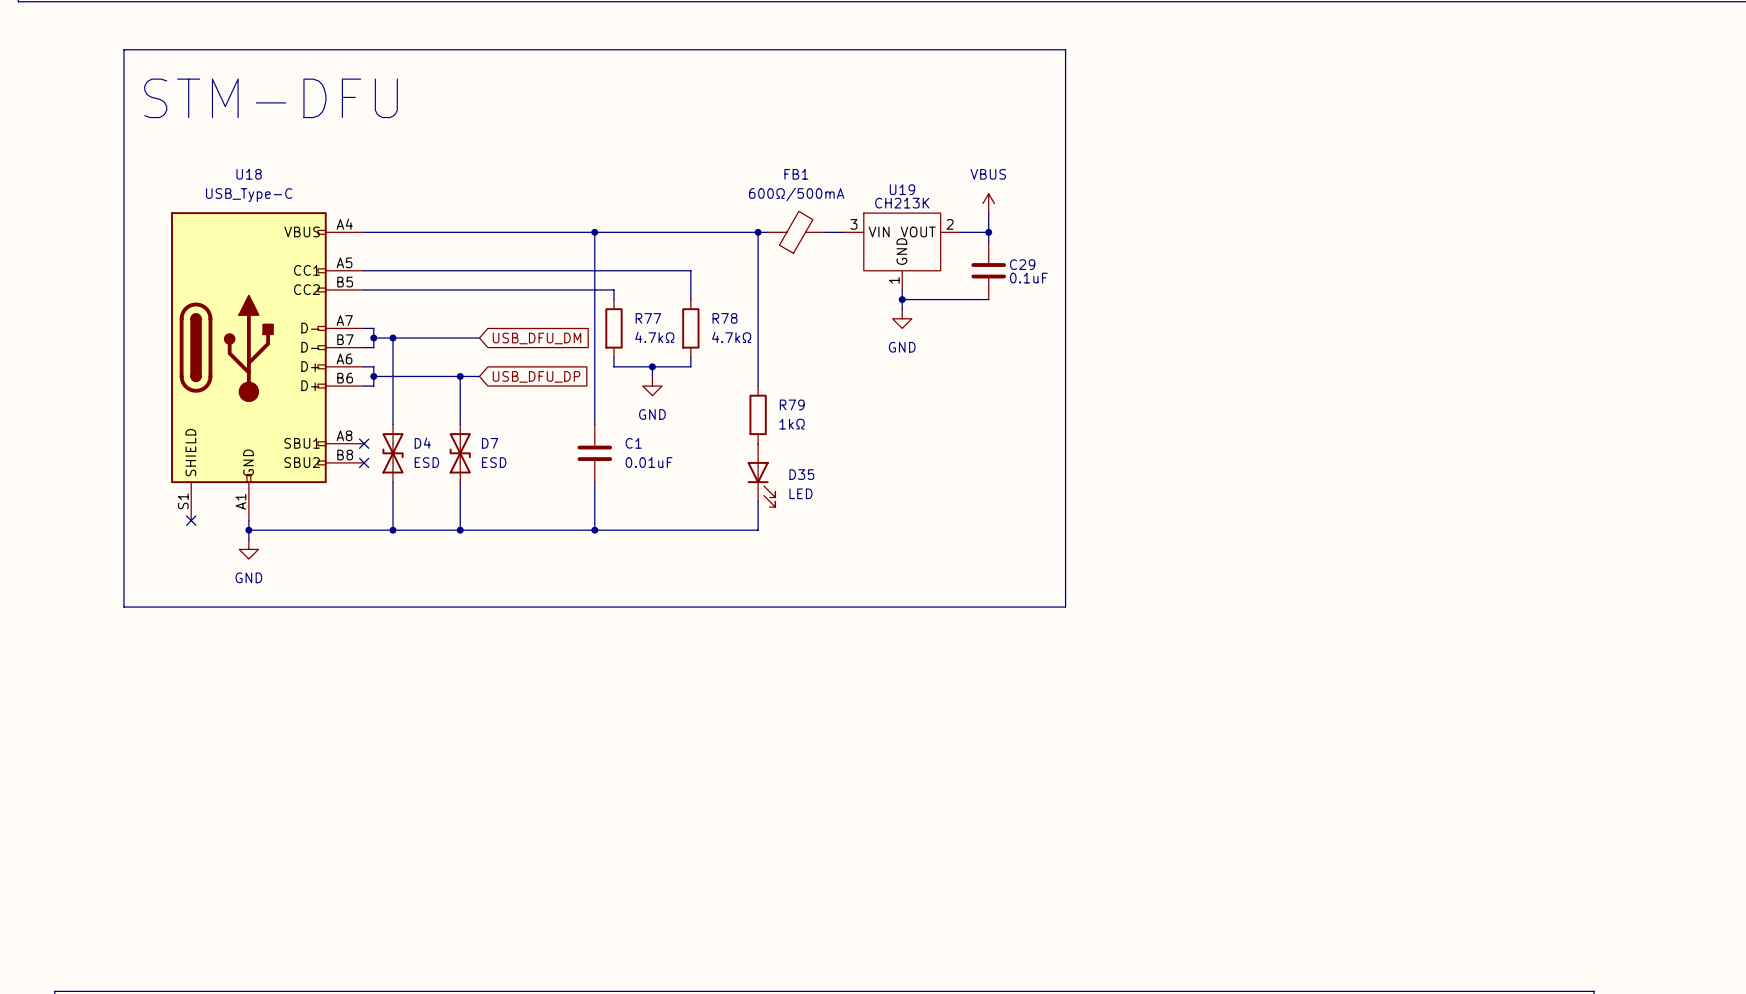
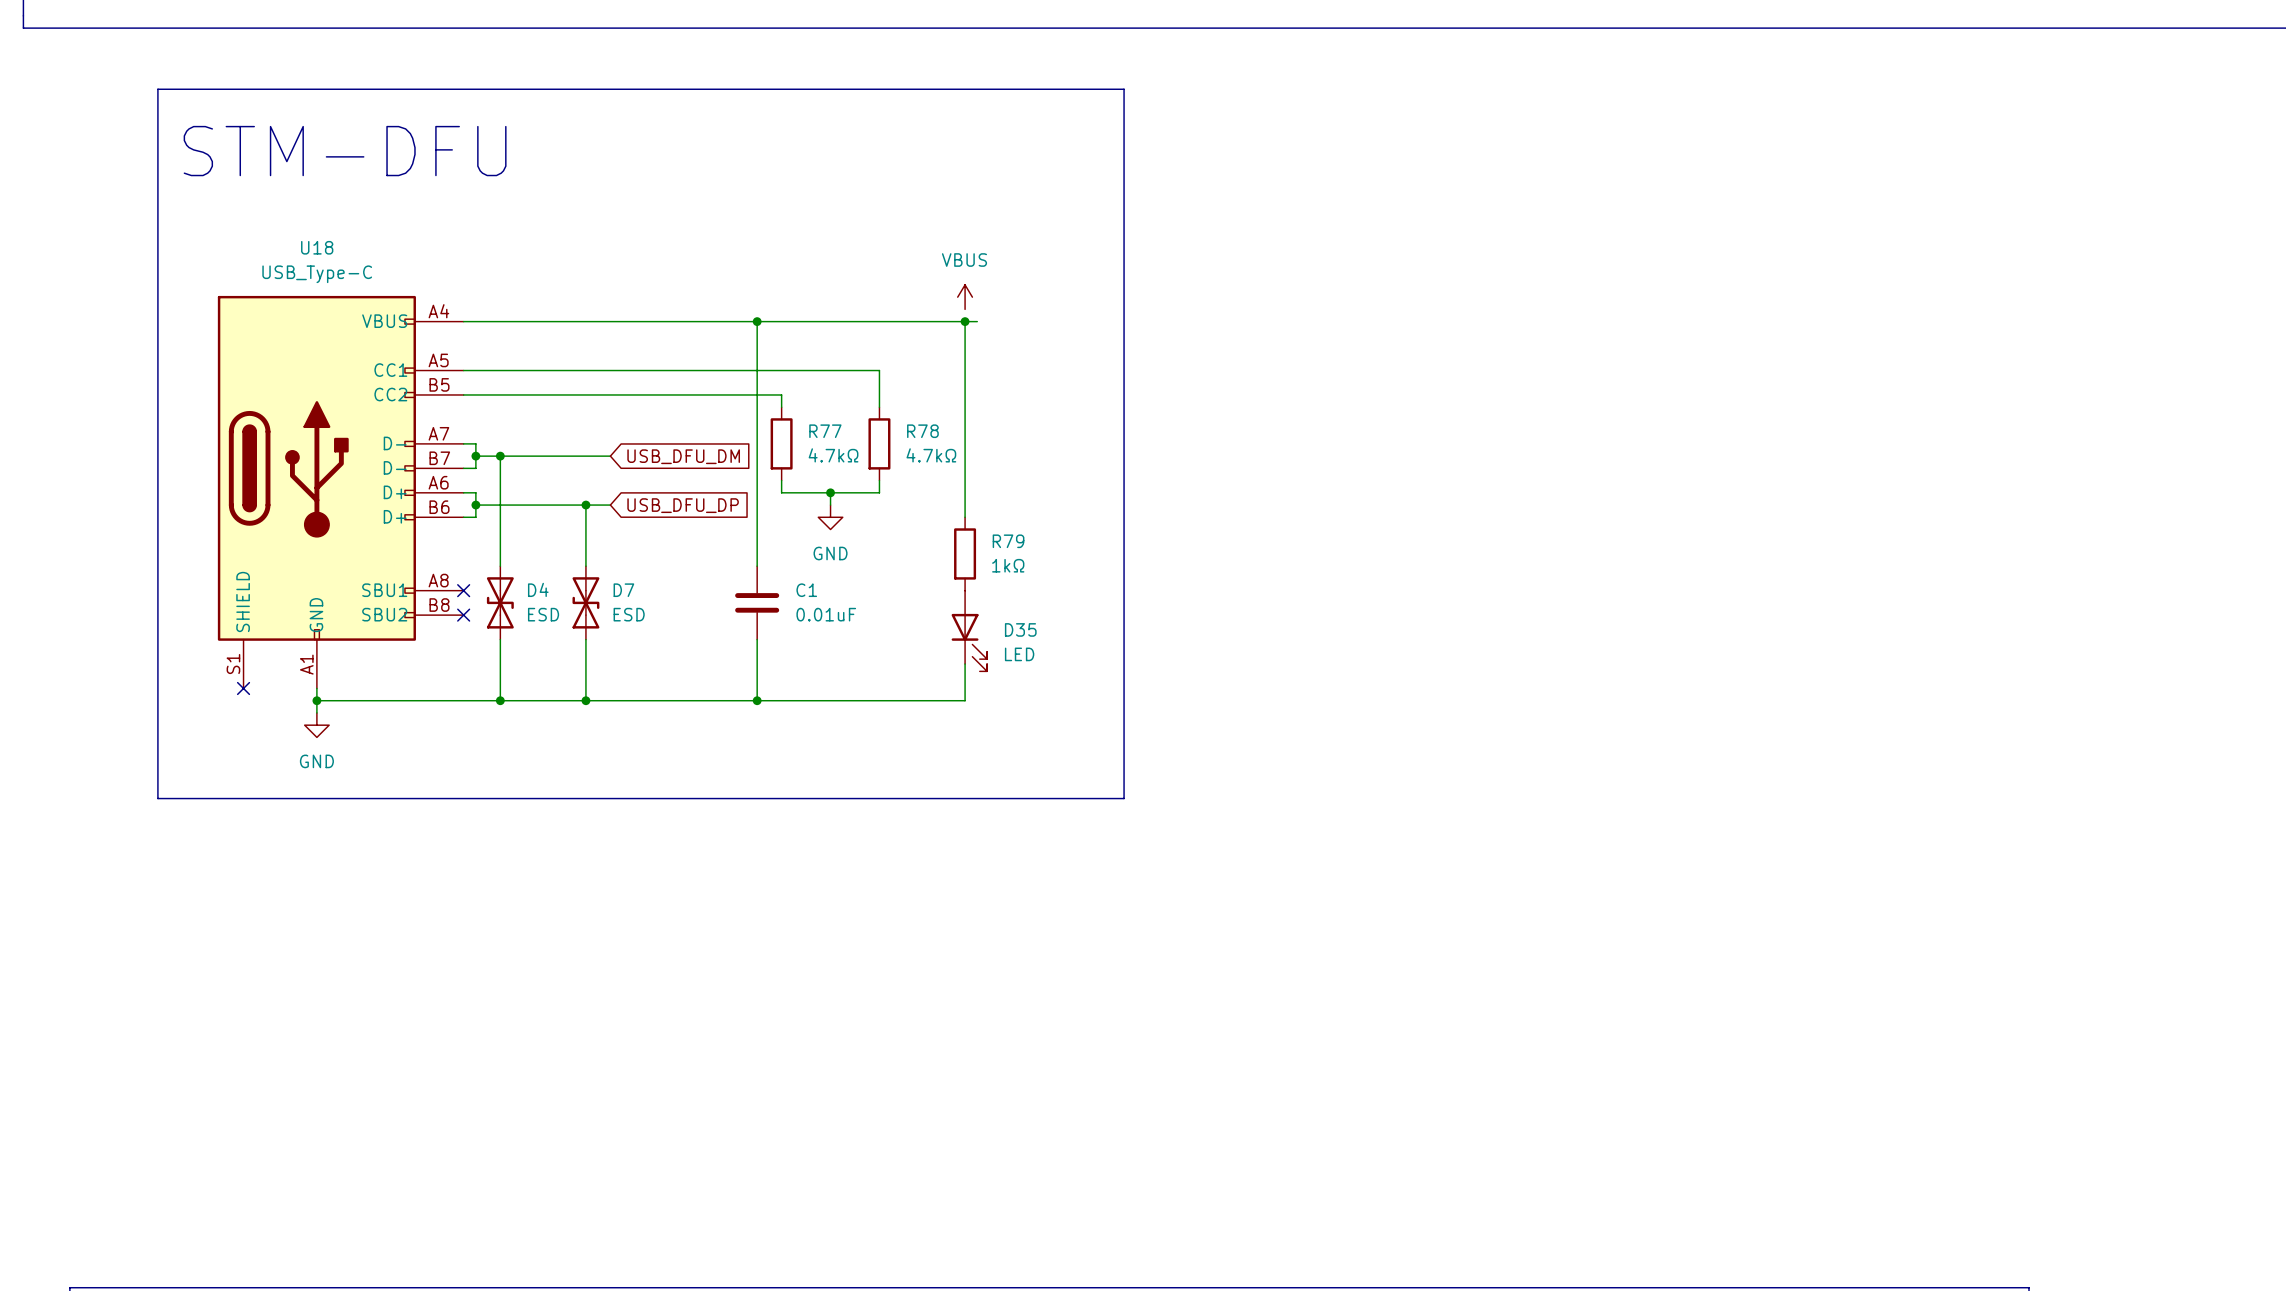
line: (883, 49) (1065, 49) (1065, 607) (883, 607) -> (1124, 89) (1124, 798)
power symbol: VBUS (988, 203) -> none
power symbol: none -> VBUS (965, 297)
wire: (988, 213) (988, 241) -> none
FB1: 600Ω/500mA (796, 232) -> none
wire: (825, 232) (844, 232) -> none
wire: (959, 232) (988, 232) -> none
junction: (988, 232) -> none
U19: CH213K (902, 251) -> none
C29: 0.1uF (988, 270) -> none
wire: (902, 289) (902, 309) -> none
wire: (902, 299) (988, 299) -> none
junction: (902, 299) -> none
power symbol: GND (902, 318) -> none

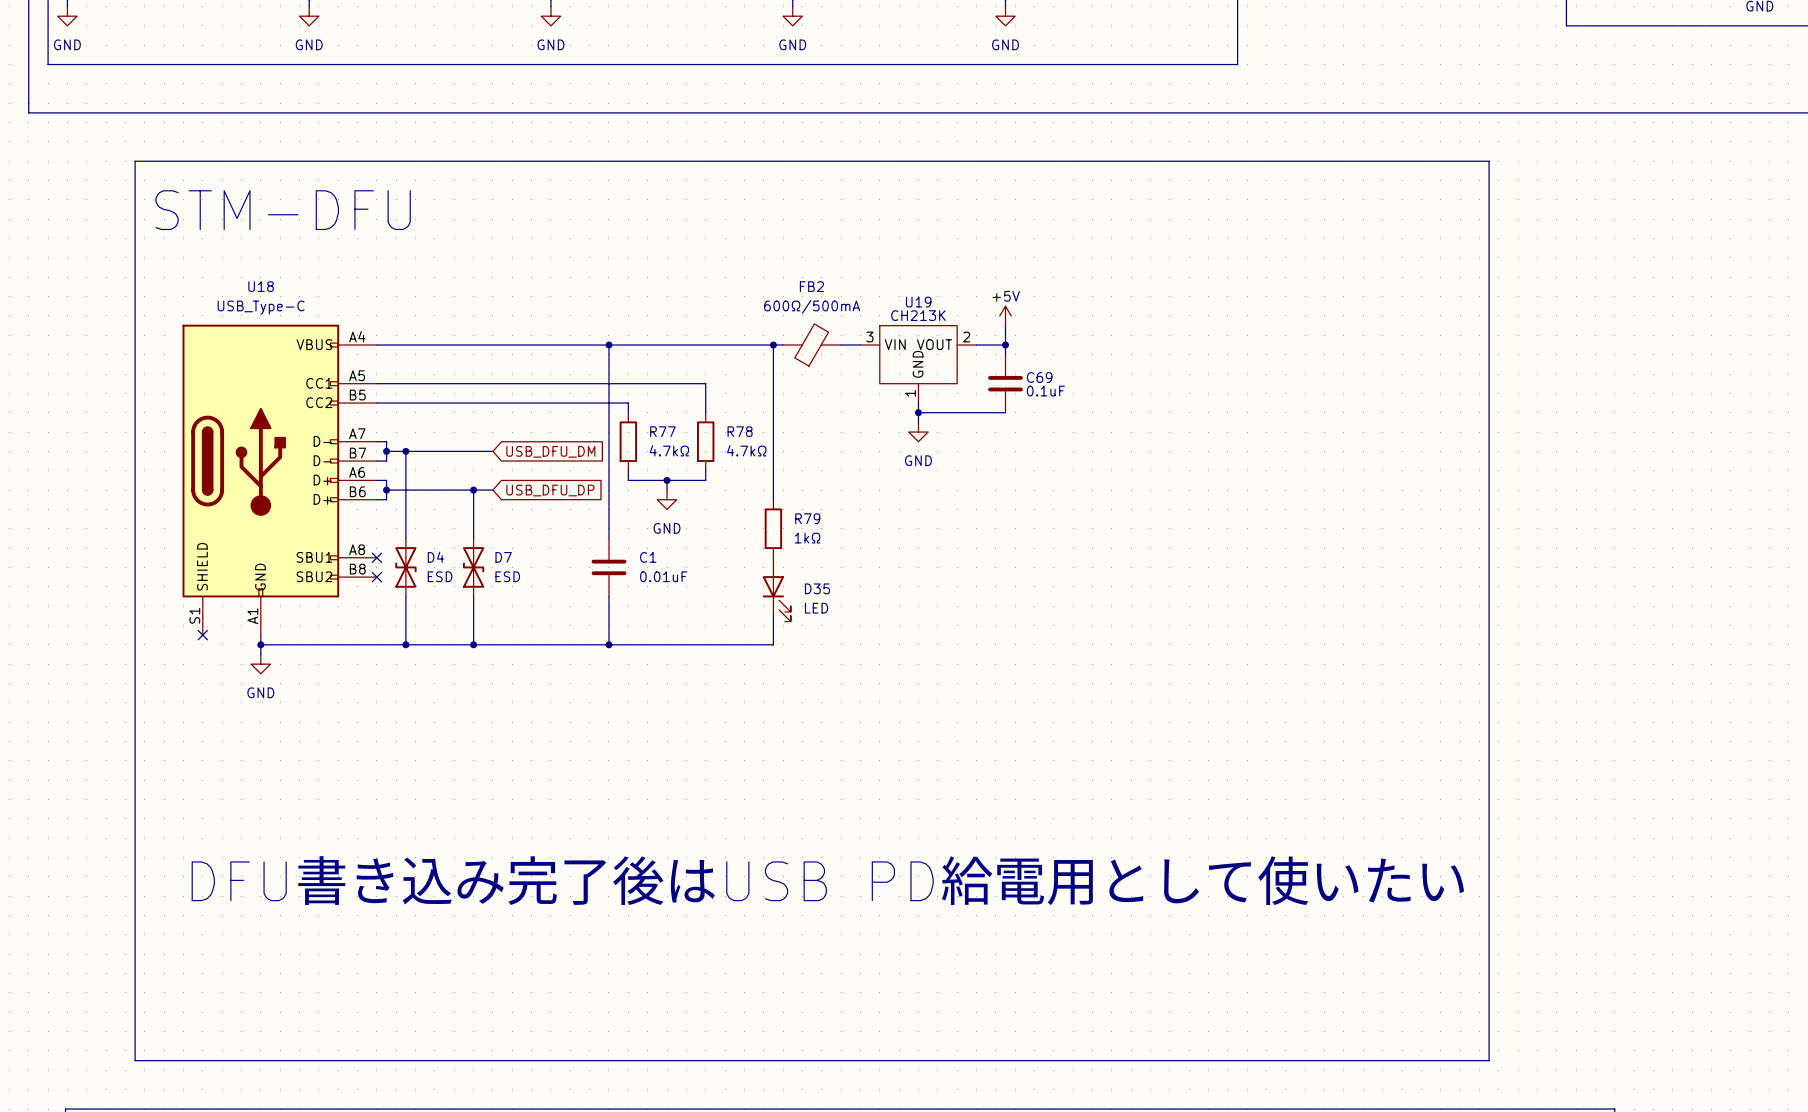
line: (1124, 89) (1124, 798) (157, 798) -> (899, 161) (1489, 161) (1489, 1060) (135, 1060) (135, 722)
power symbol: none -> +5V (1005, 315)
power symbol: VBUS (965, 297) -> none
wire: none -> (1005, 325) (1005, 354)
FB2: none -> 600Ω/500mA (812, 345)
wire: none -> (841, 345) (860, 345)
wire: none -> (976, 345) (1005, 345)
junction: none -> (1005, 345)
U19: none -> CH213K (918, 364)
C69: none -> 0.1uF (1005, 383)
wire: none -> (918, 403) (918, 422)
wire: none -> (918, 412) (1005, 412)
junction: none -> (918, 412)
power symbol: none -> GND (918, 432)
text: none -> DFU書き込み完了後はUSB PD給電用として使いたい (828, 880)

